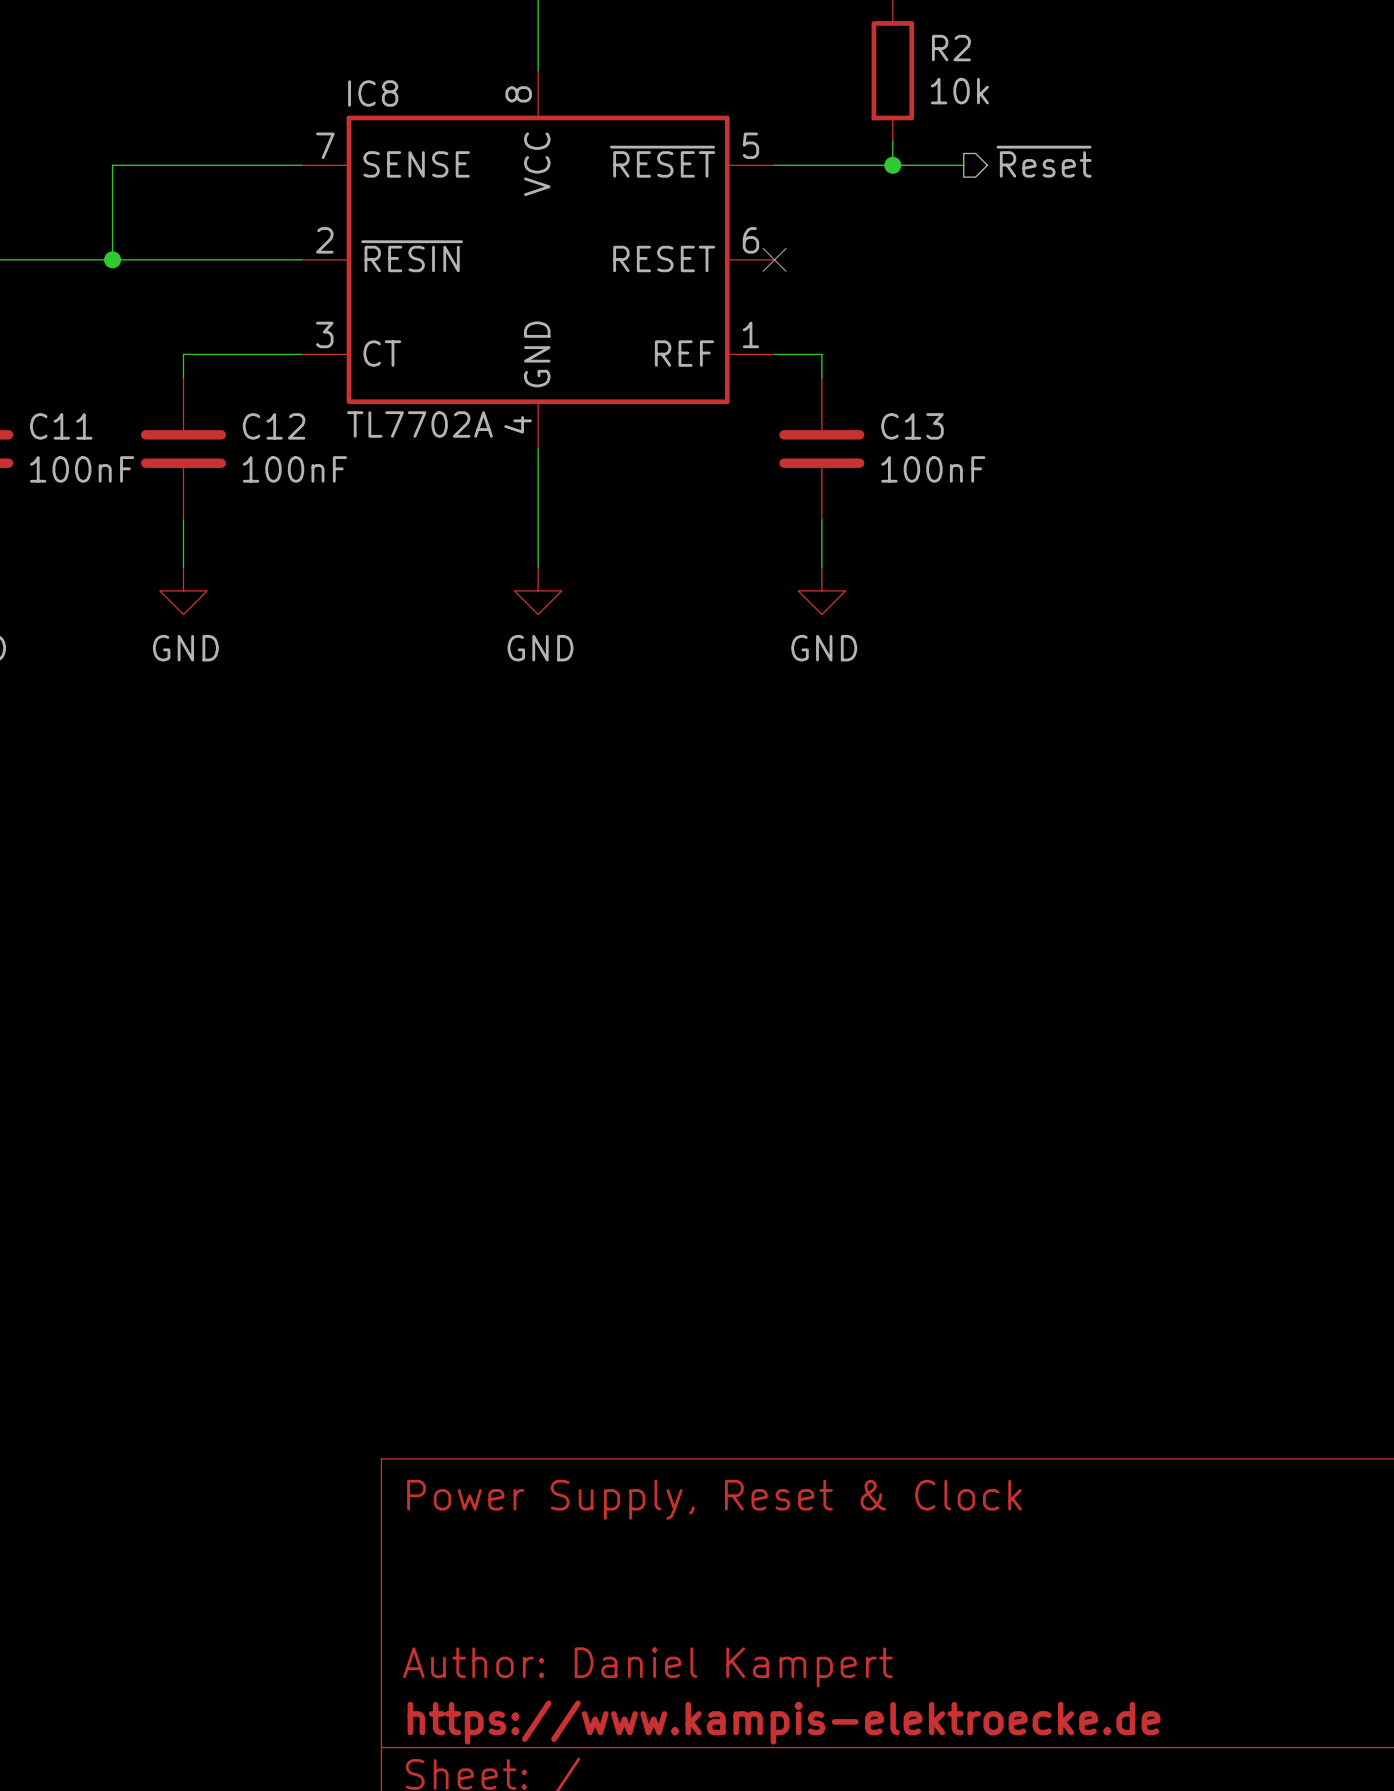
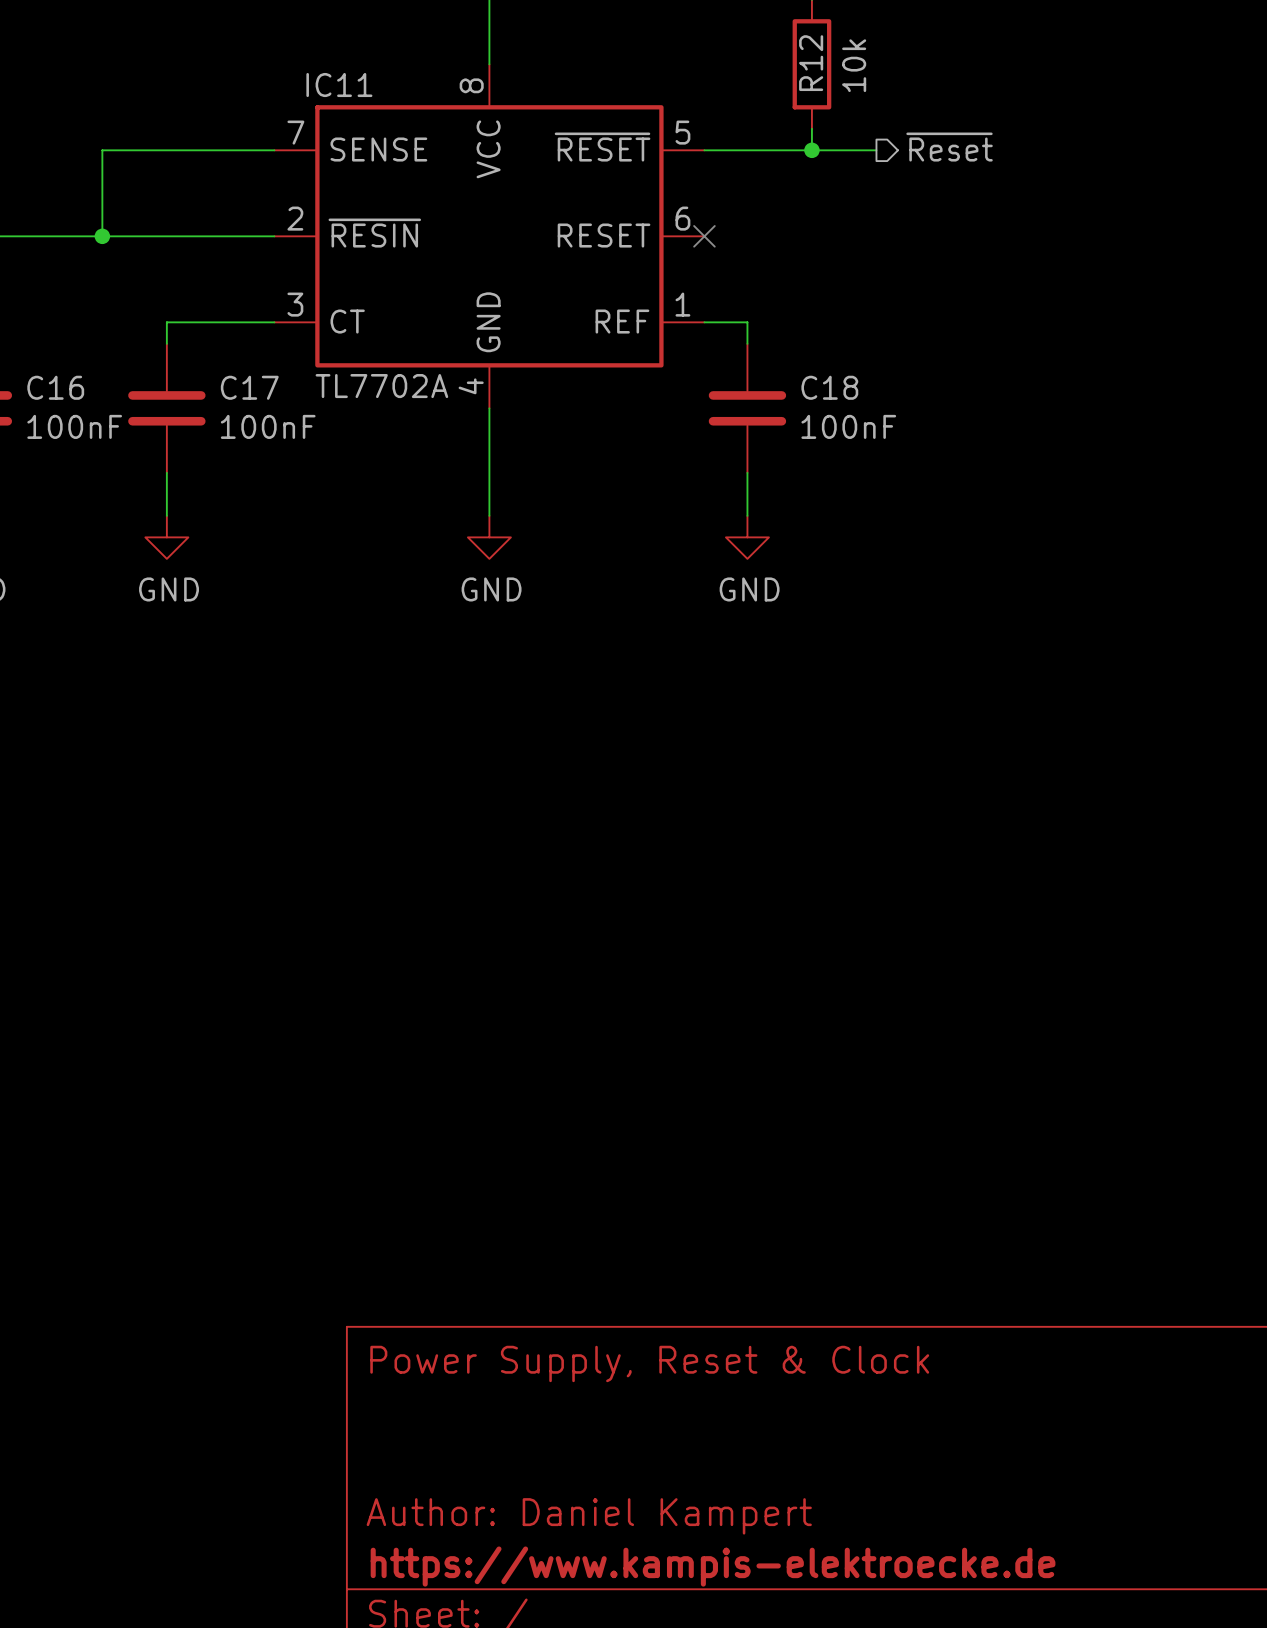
R2 name: R2 (951, 48) -> R12 (811, 63)
R2 value rotation: 0° (959, 91) -> 90° counterclockwise (854, 65)
IC8 name: IC8 (373, 93) -> IC11 (339, 85)
C11 name: C11 (61, 426) -> C16 (55, 387)
C12 name: C12 (274, 426) -> C17 (249, 387)
C13 name: C13 (912, 426) -> C18 (829, 387)

